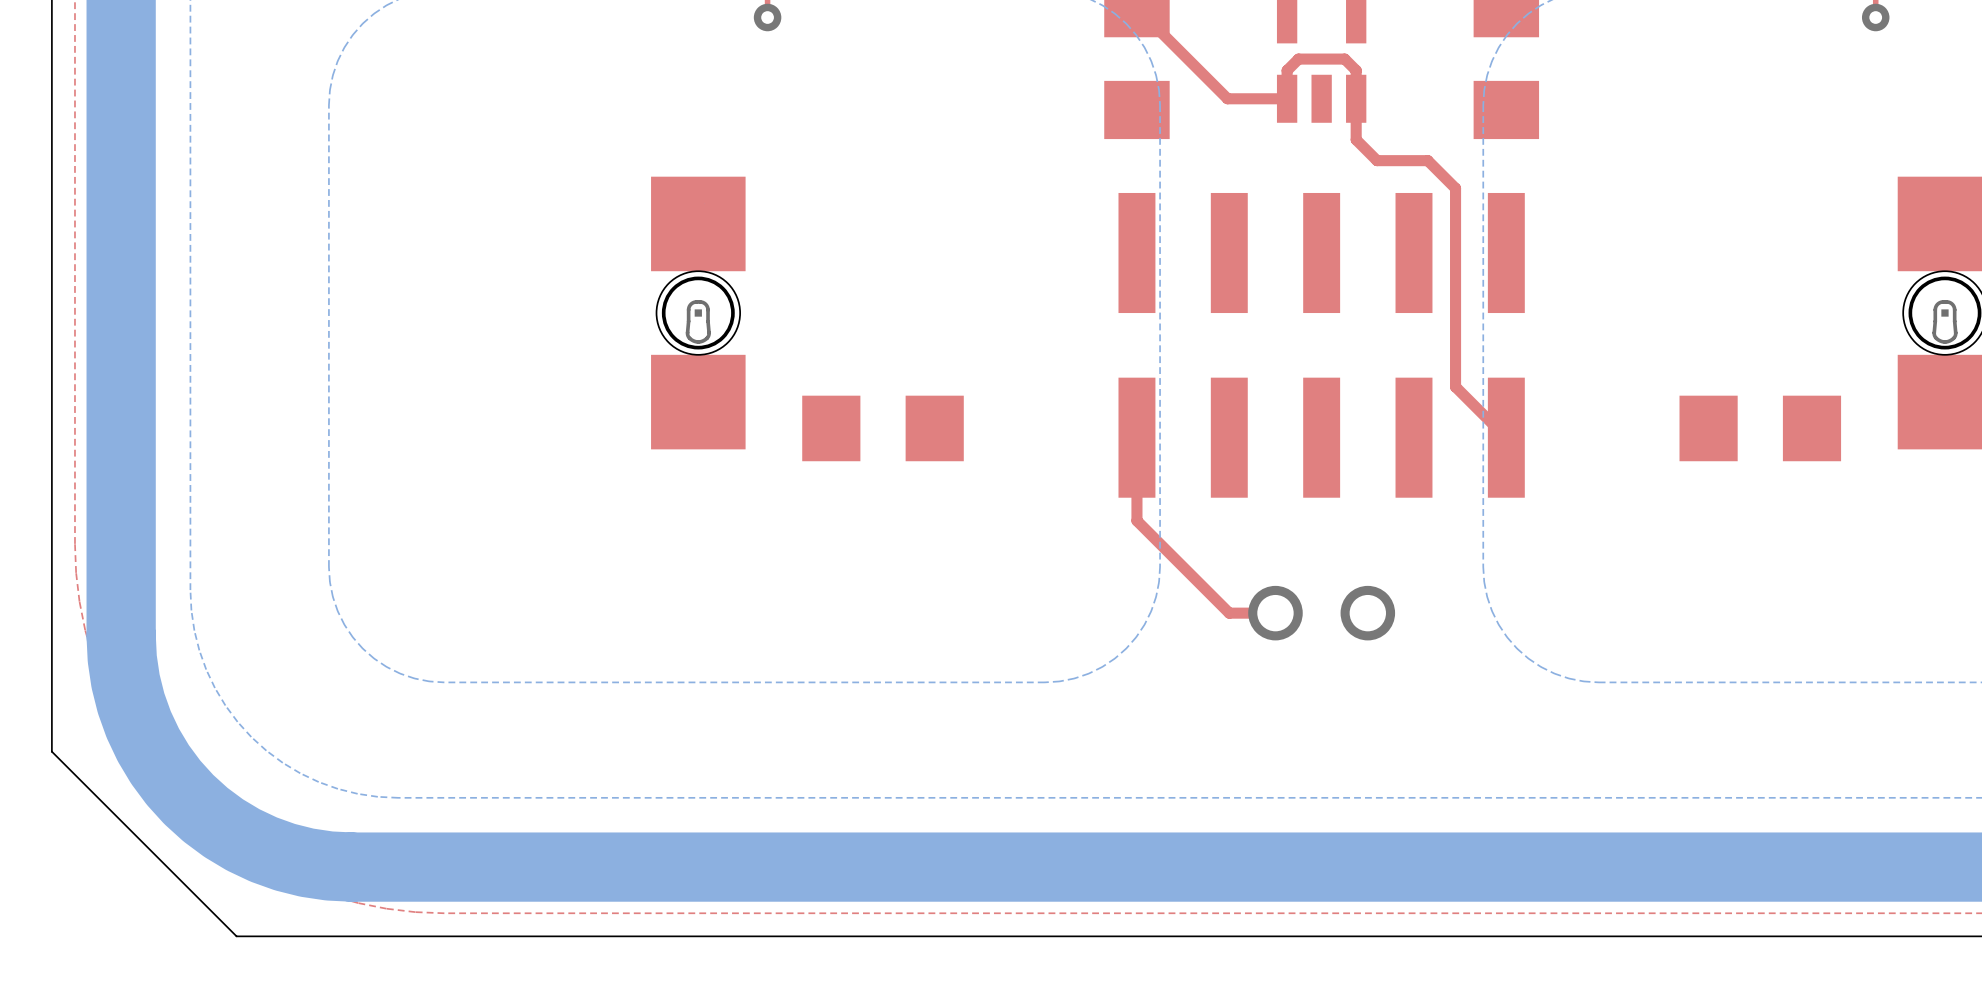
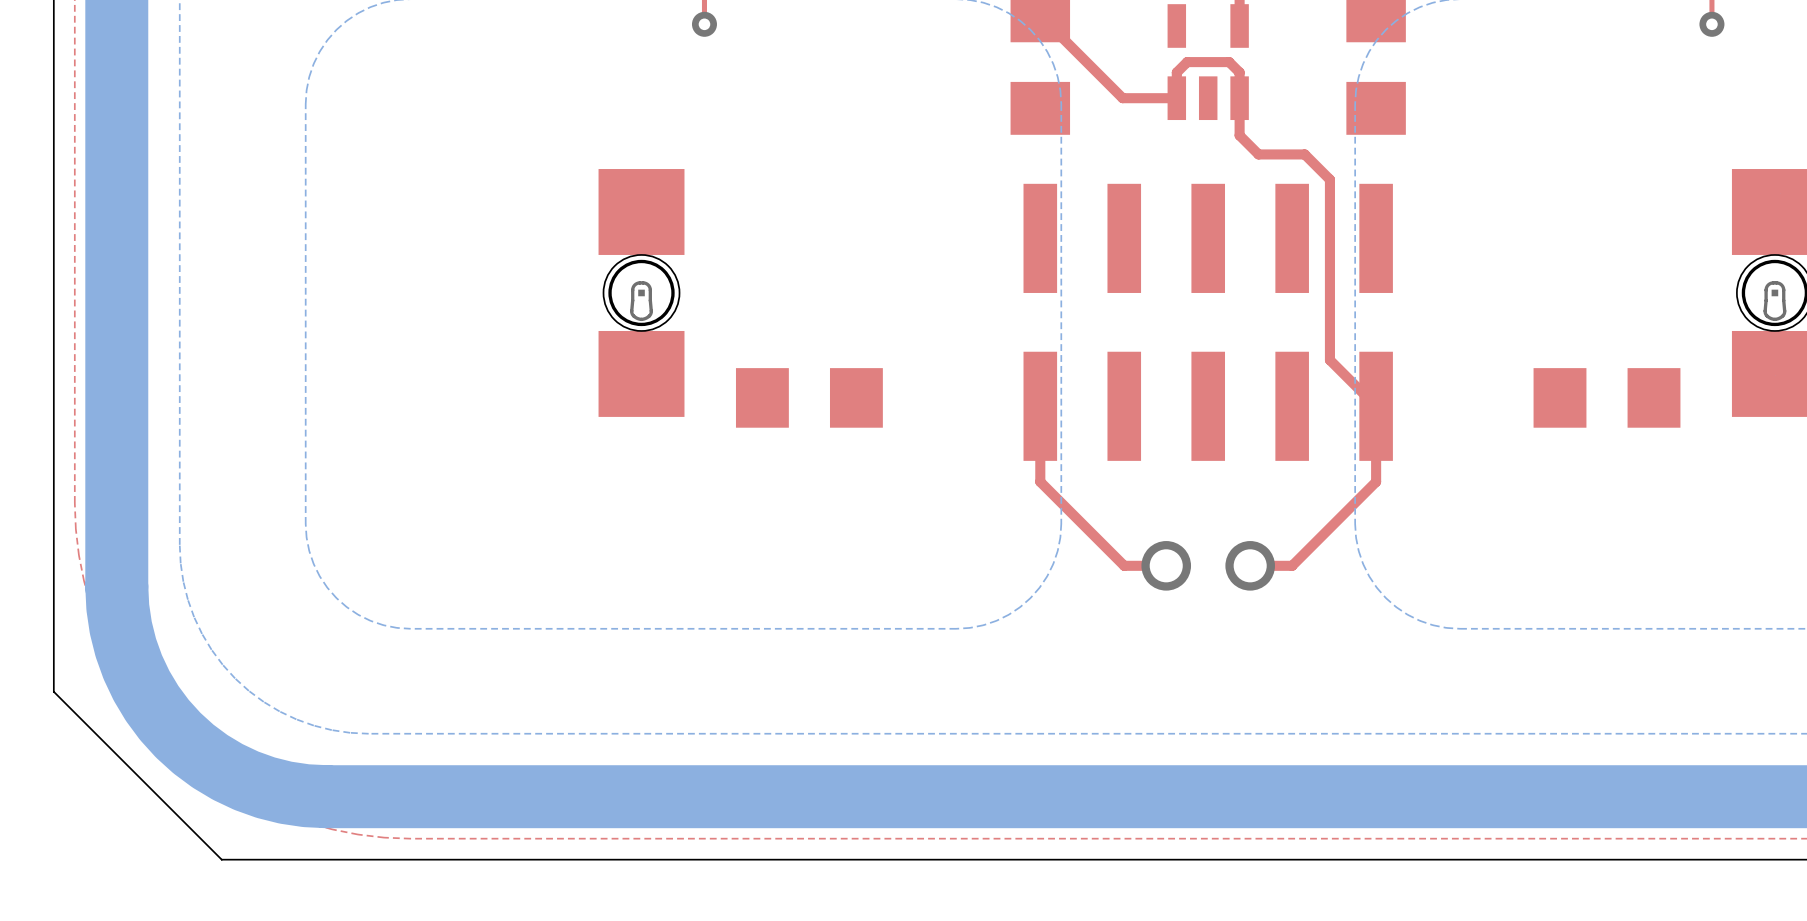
top track: none -> (1376, 406) (1376, 481) (1292, 565) (1250, 565)

